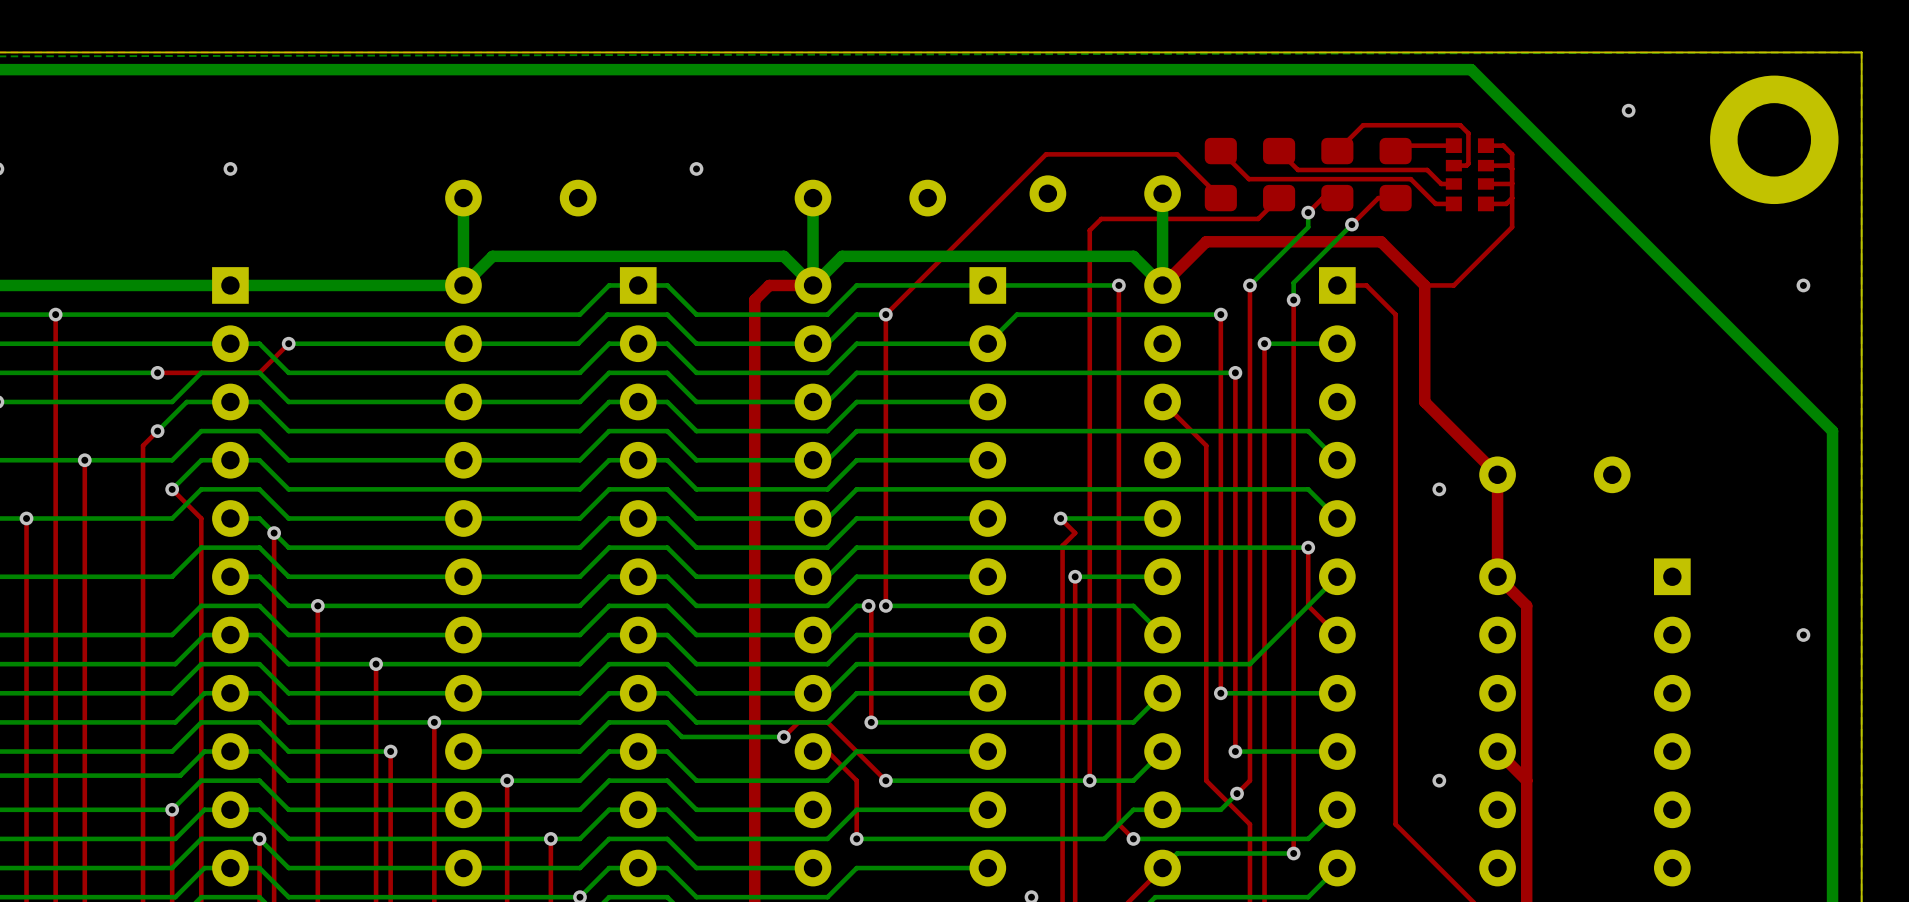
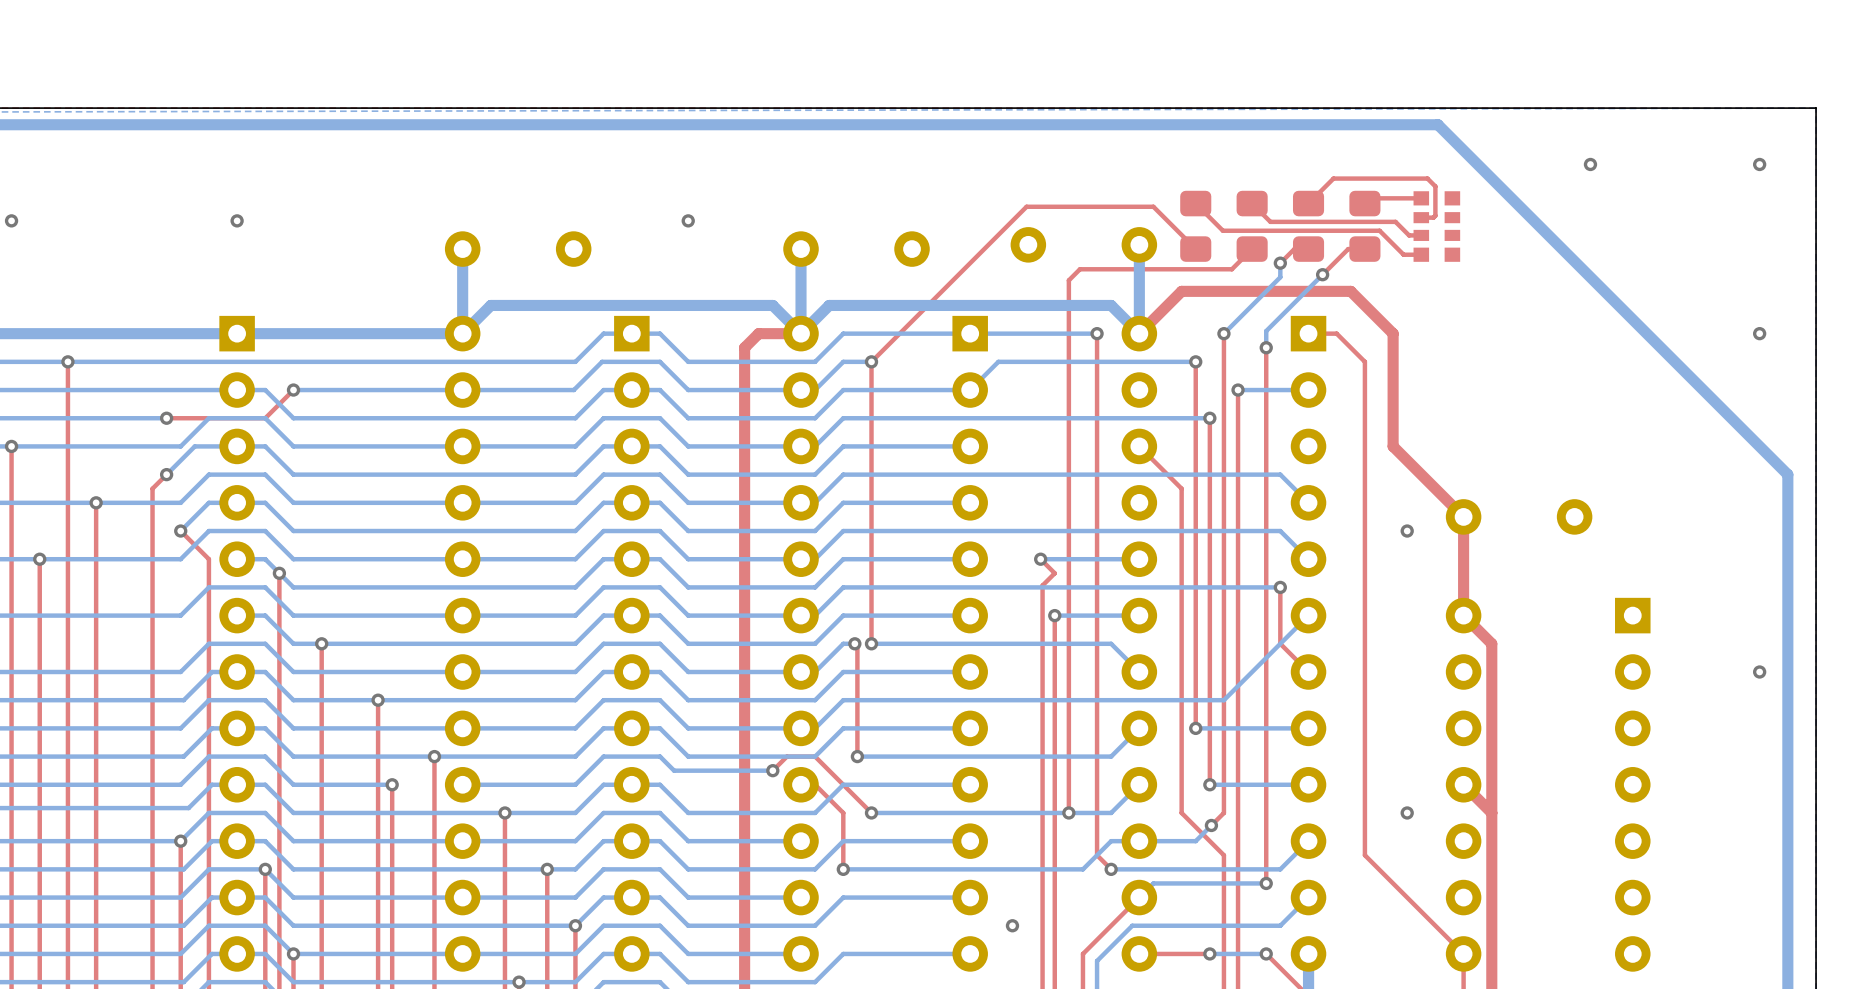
via: none -> (1759, 164)
part: (1774, 139) -> none
top track: (1485, 145) (1503, 145) (1512, 154) (1512, 227) (1453, 285) (1424, 285) -> none
top track: (1485, 165) (1508, 165) (1512, 168) -> none
top track: (1512, 183) (1485, 183) -> none
top track: (1512, 198) (1506, 203) (1485, 203) -> none

